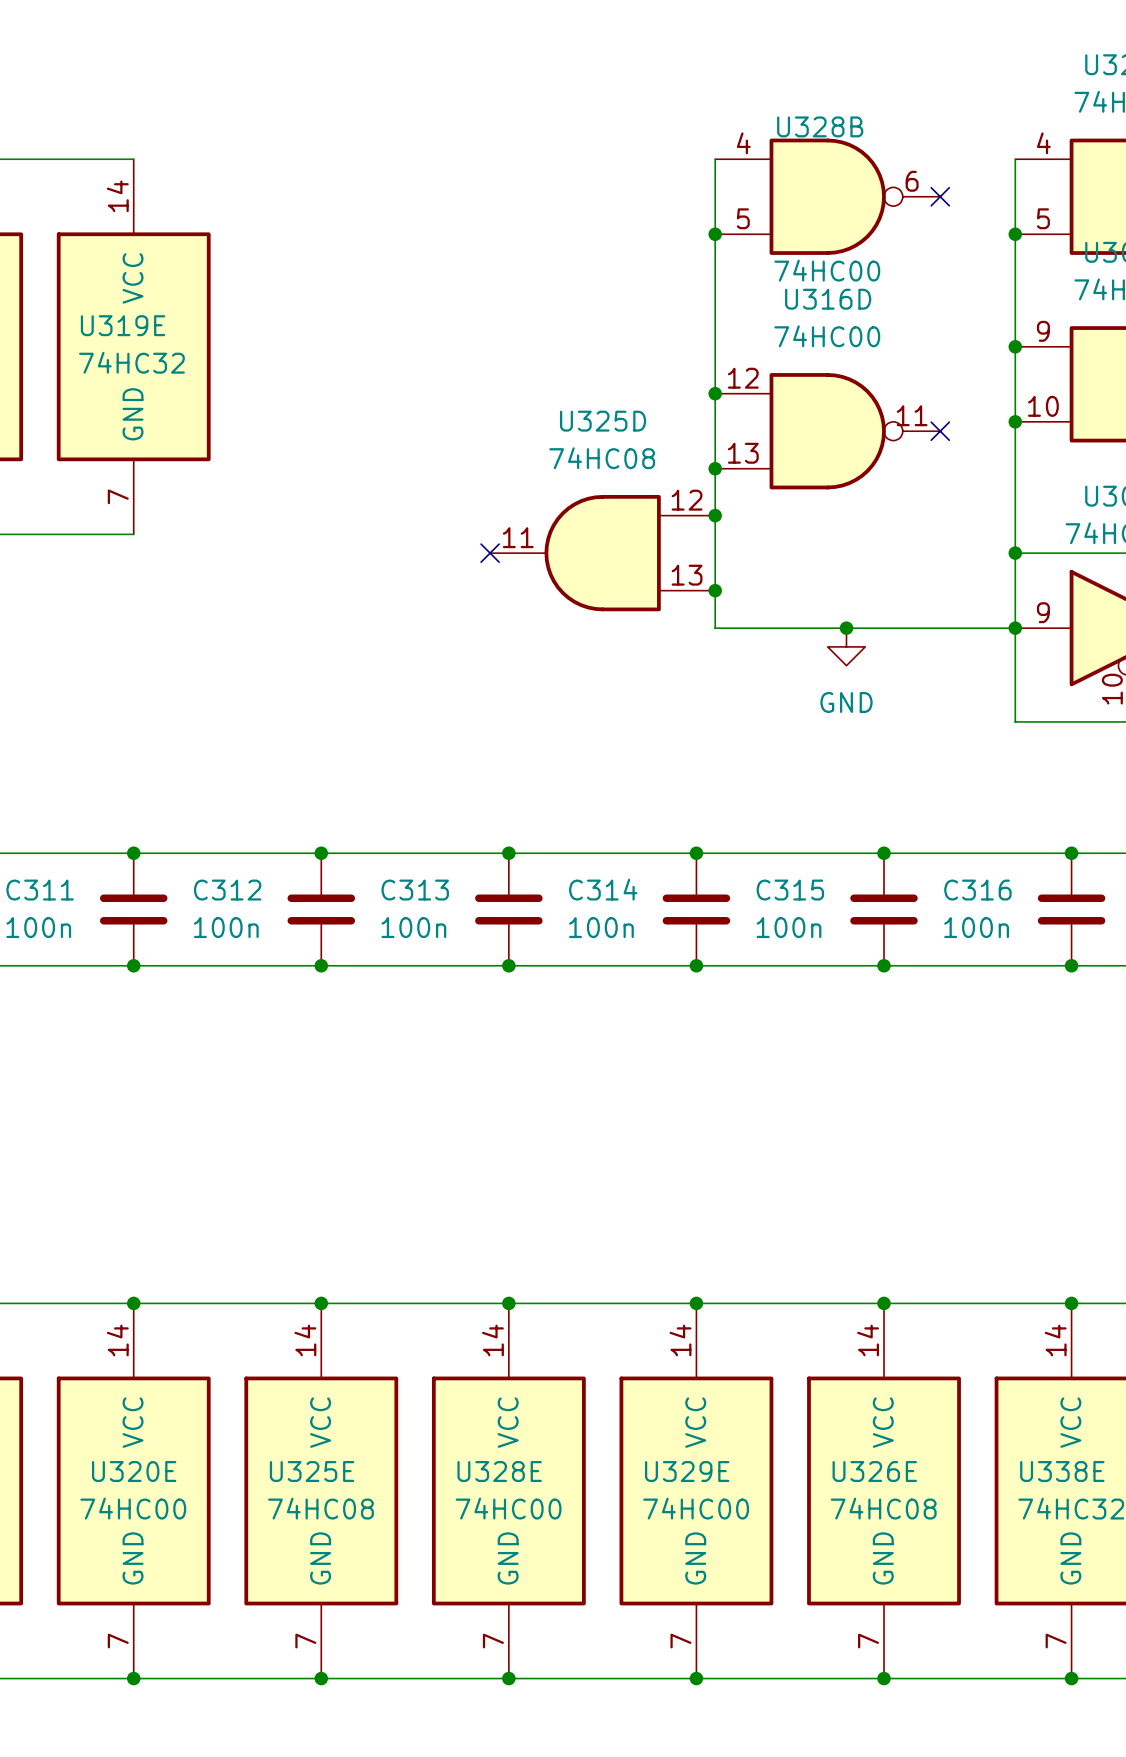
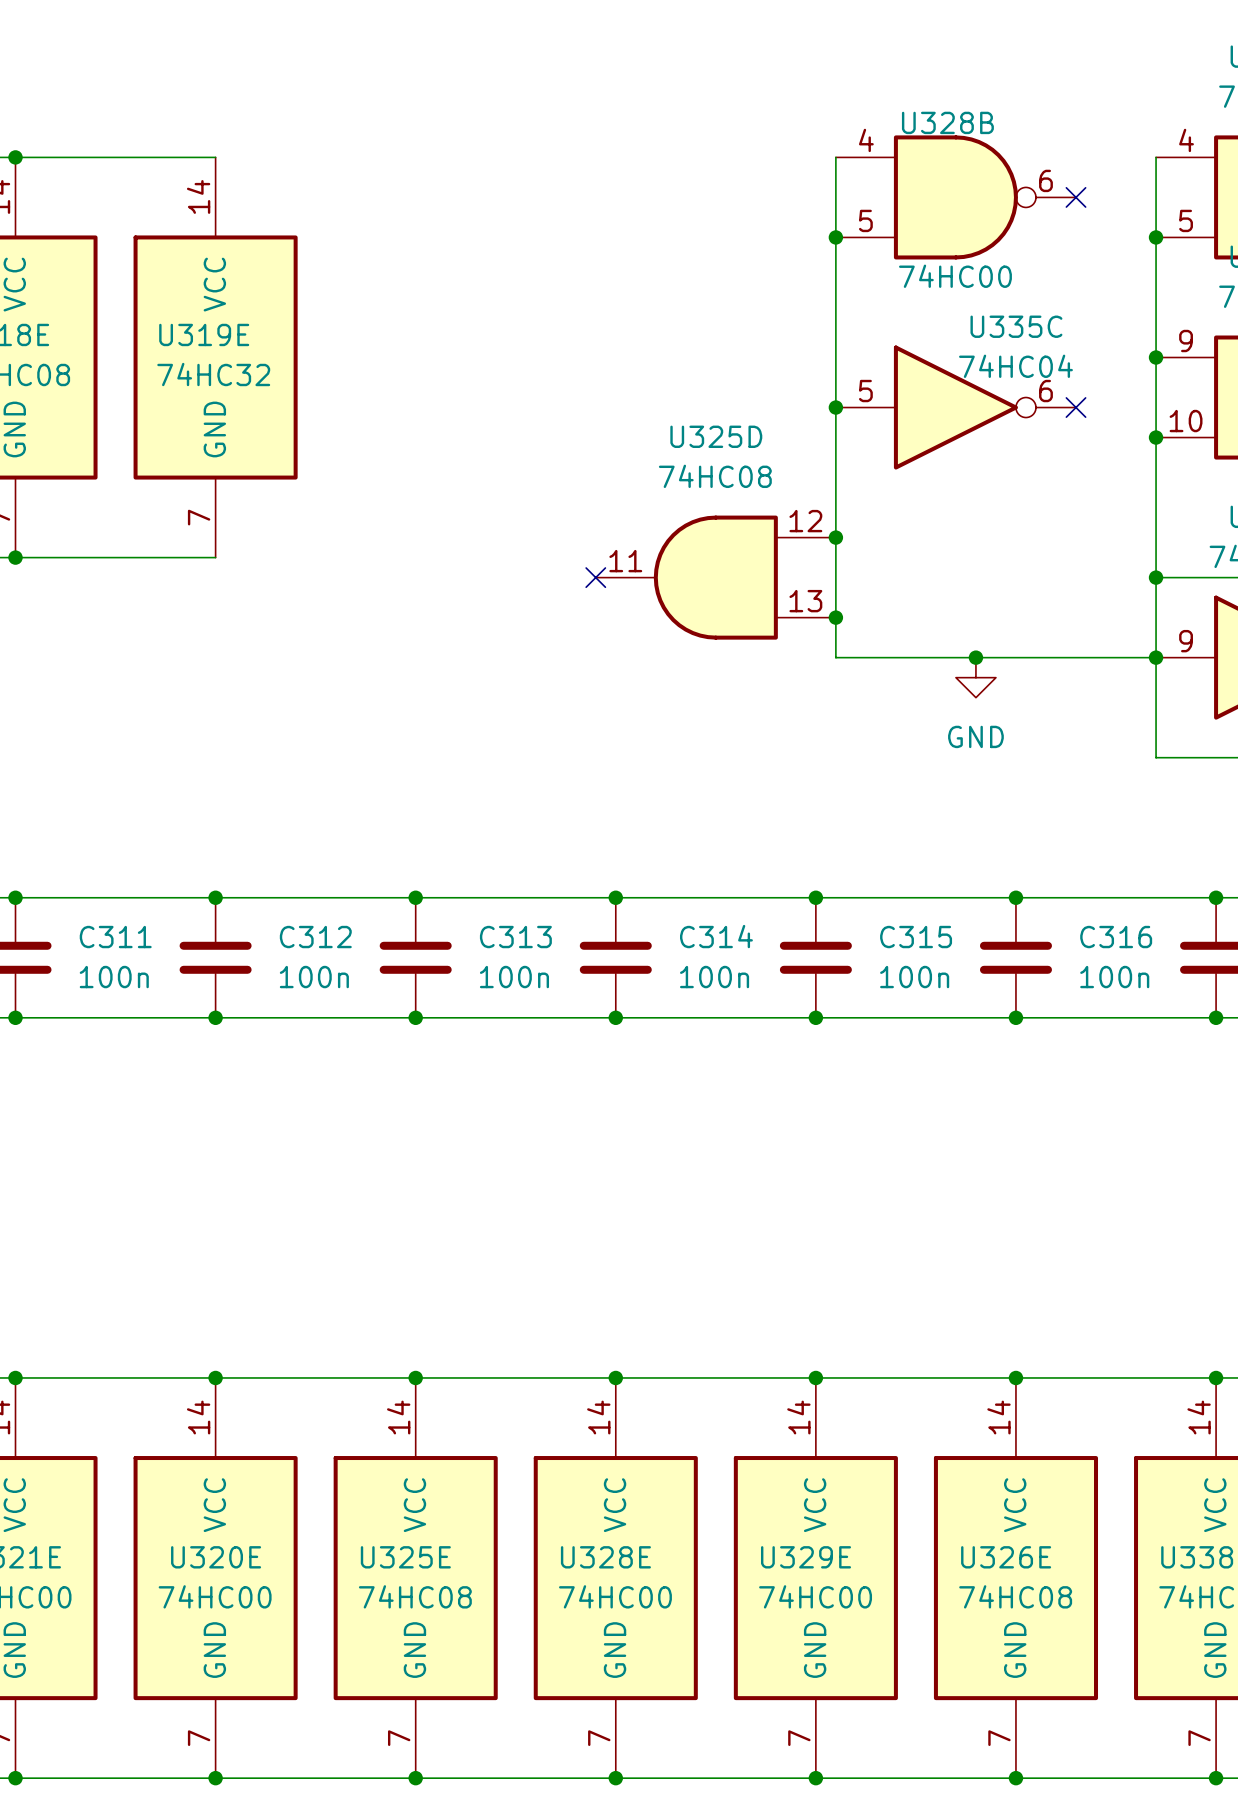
U335C: none -> 74HC04 (955, 407)
U316D: 74HC00 (827, 431) -> none
no-connect mark position: (940, 431) -> (1076, 407)
junction: (715, 468) -> none

